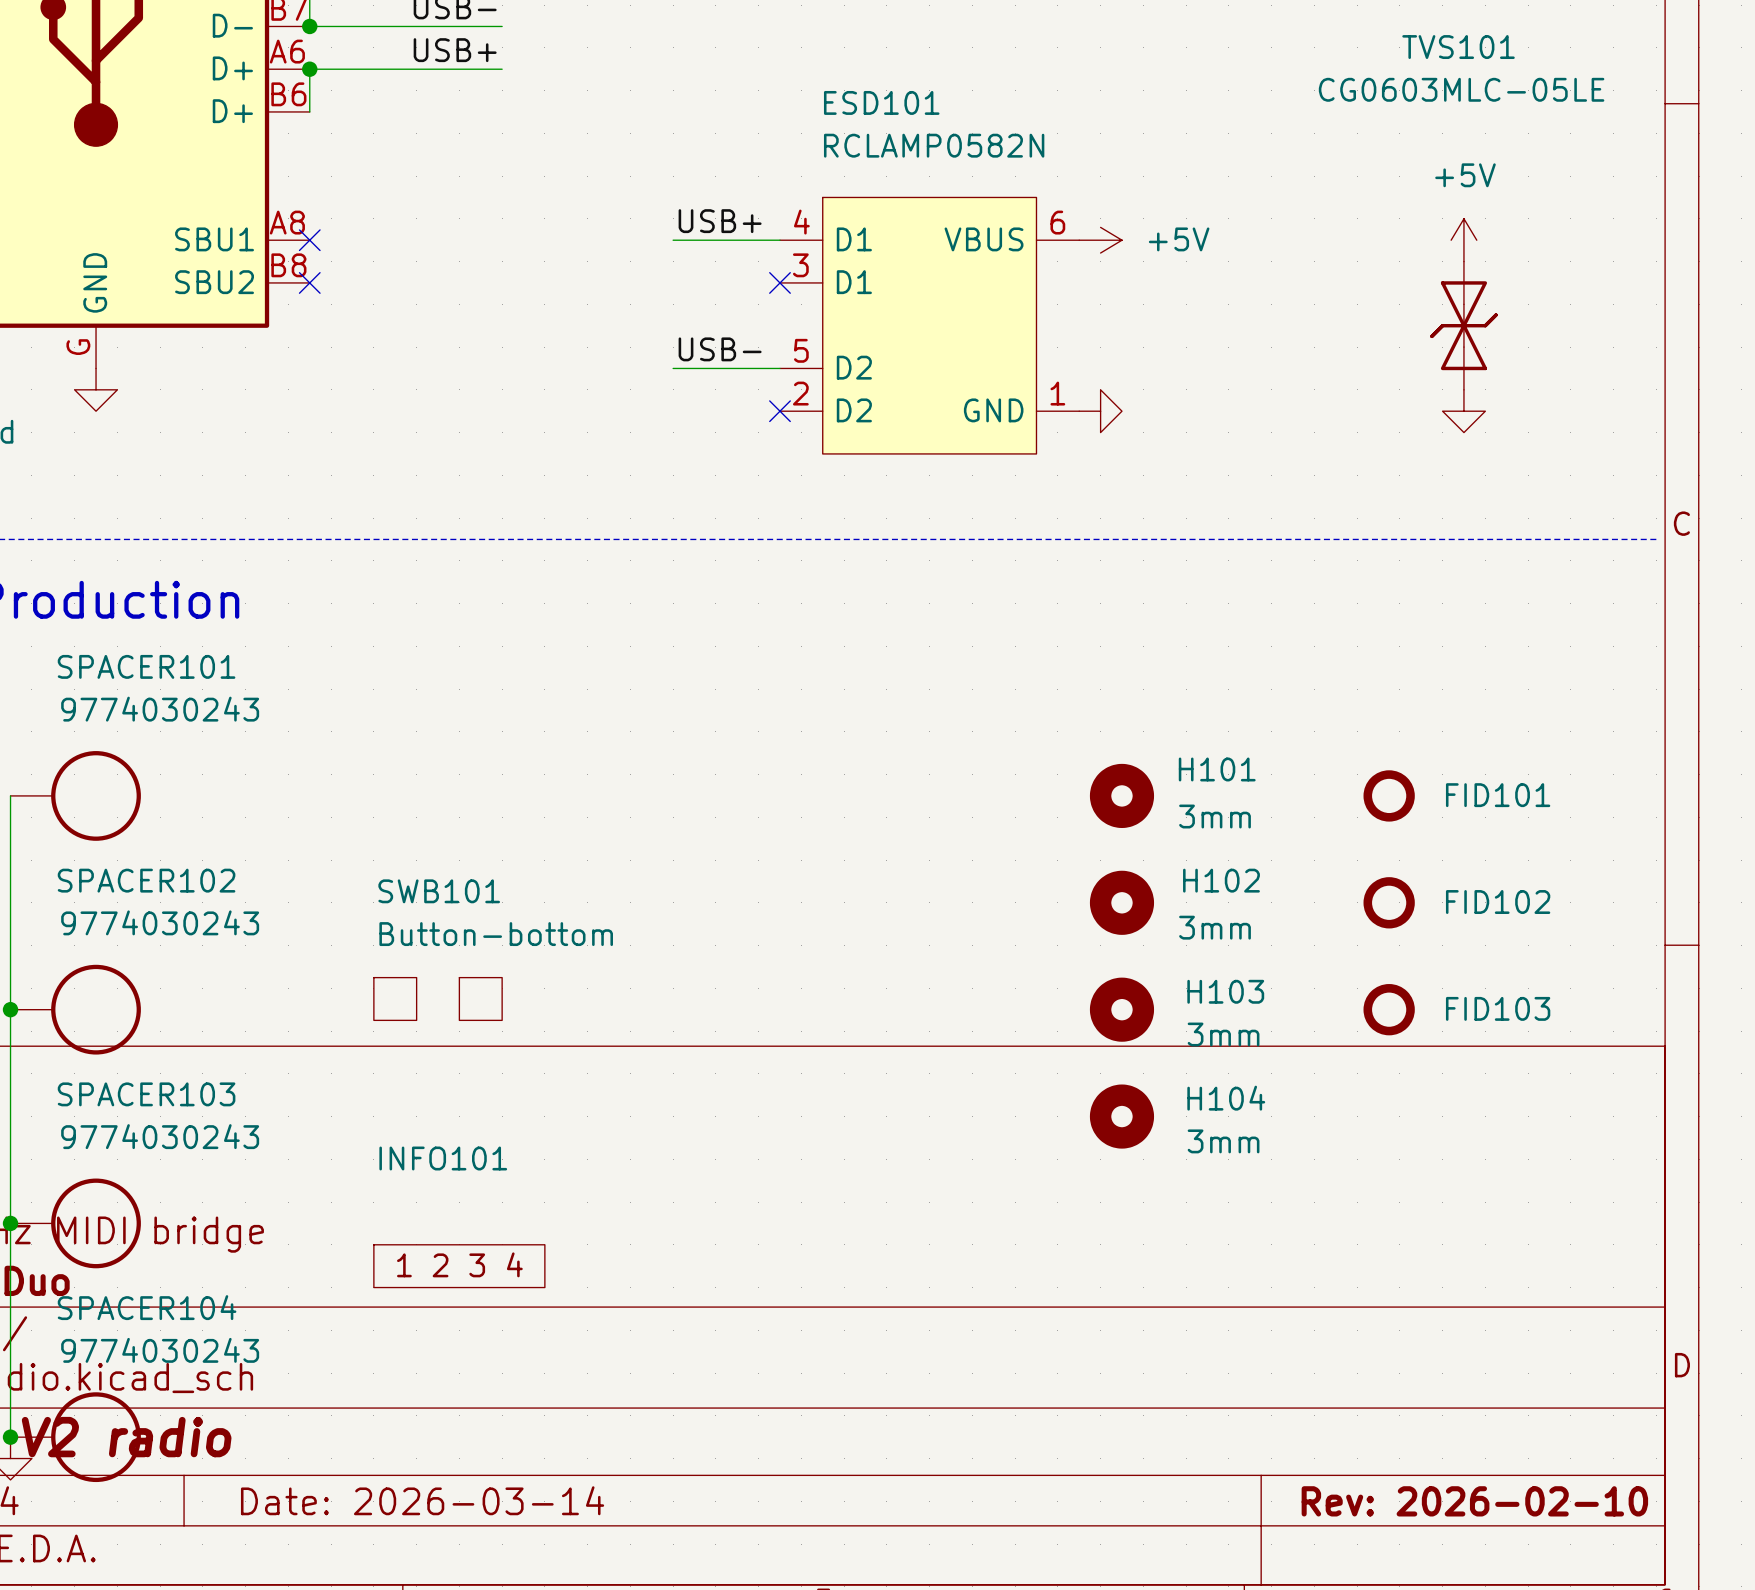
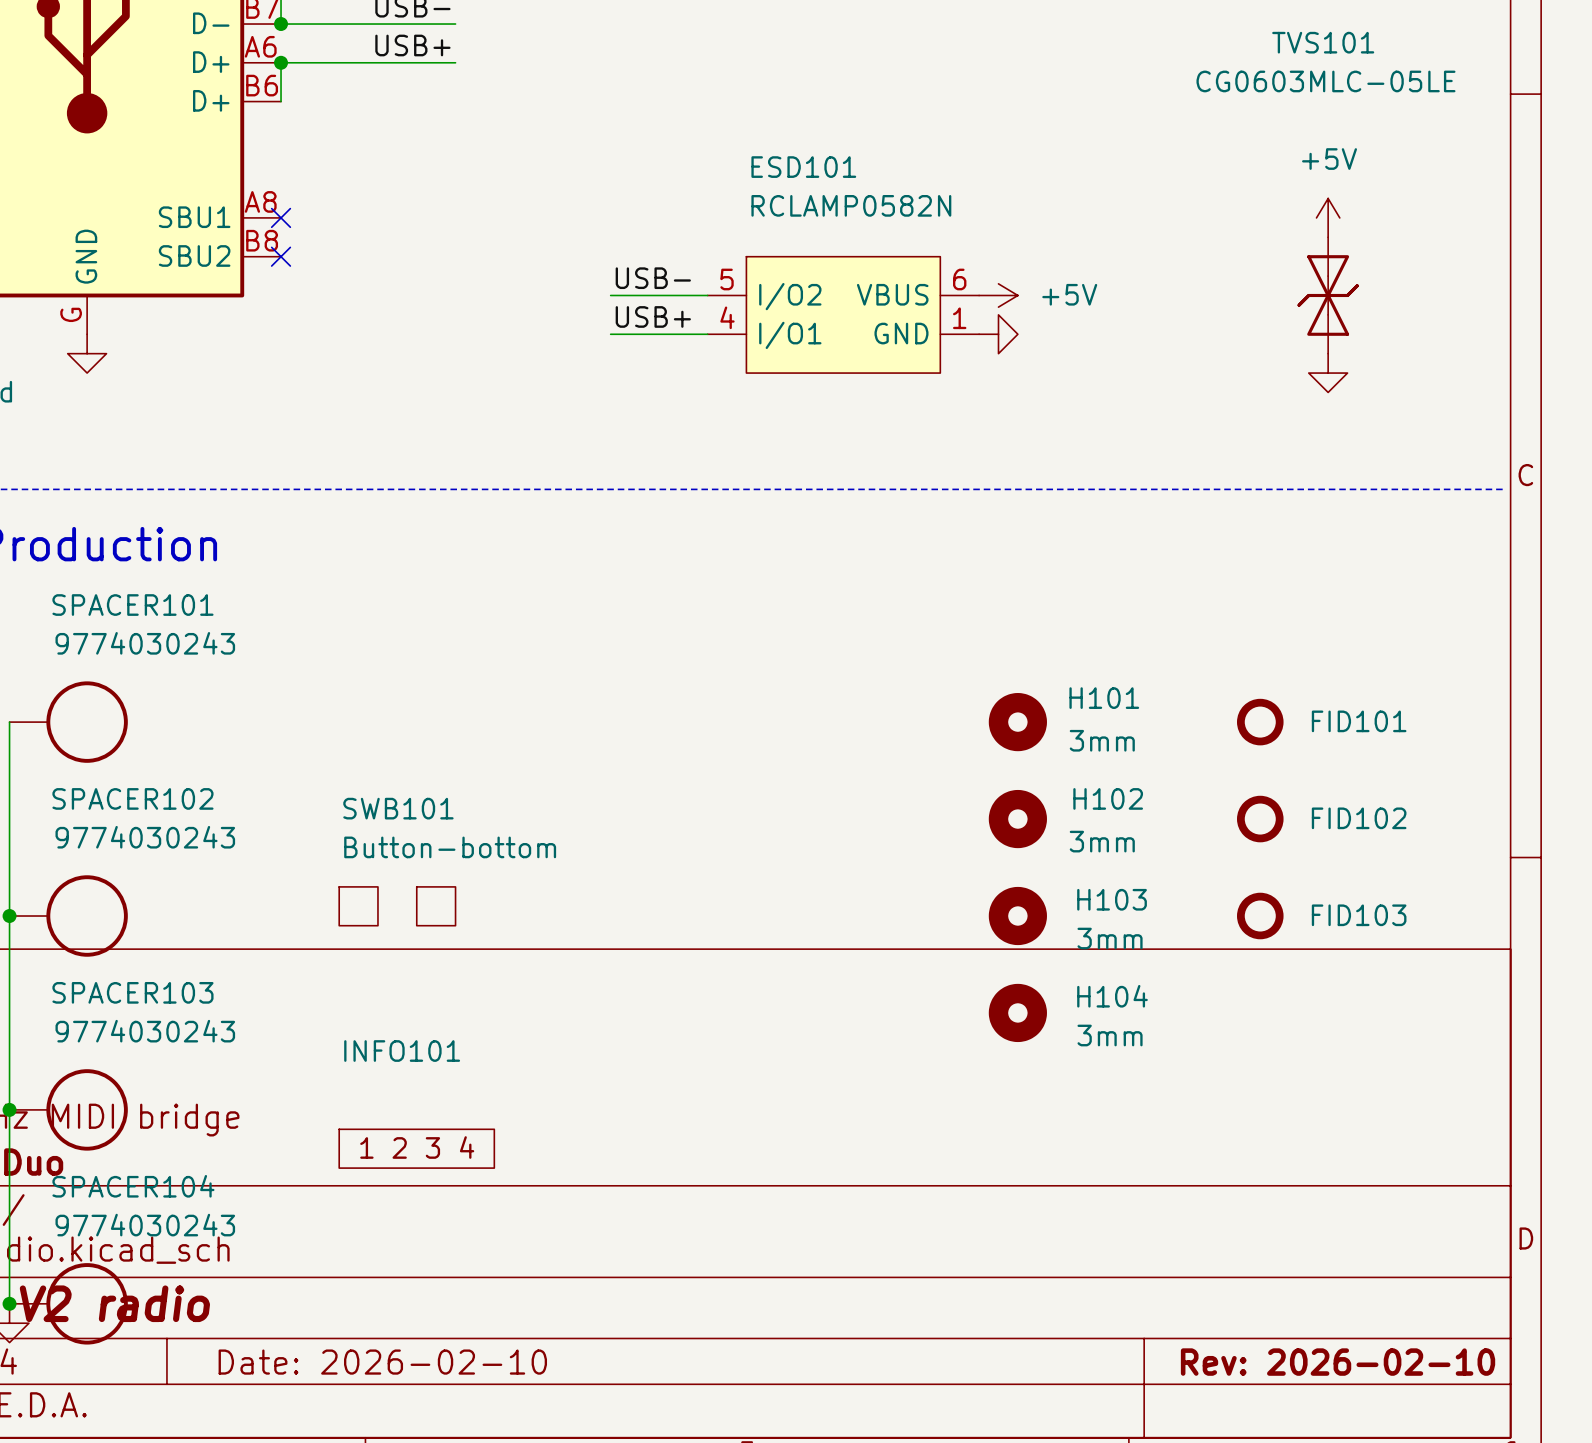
ESD101 name position: ESD101 (881, 102) -> ESD101 (803, 167)
ESD101 value position: RCLAMP0582N (934, 145) -> RCLAMP0582N (851, 205)
ESD101 symbol: [779, 197, 1080, 454] -> [707, 256, 980, 374]
label: USB+ (720, 221) -> none
wire: (673, 240) (779, 240) -> (610, 295) (707, 295)
power symbol position: +5V (1100, 240) -> +5V (998, 295)
no-connect mark: (779, 282) -> none
label: none -> USB- (653, 278)
label: USB- (720, 349) -> USB+ (653, 316)
no-connect mark: (779, 411) -> none
power symbol position: (1100, 411) -> (998, 334)
title block: Date: 2026-03-14 (422, 1500) -> Date: 2026-02-10 (382, 1362)

